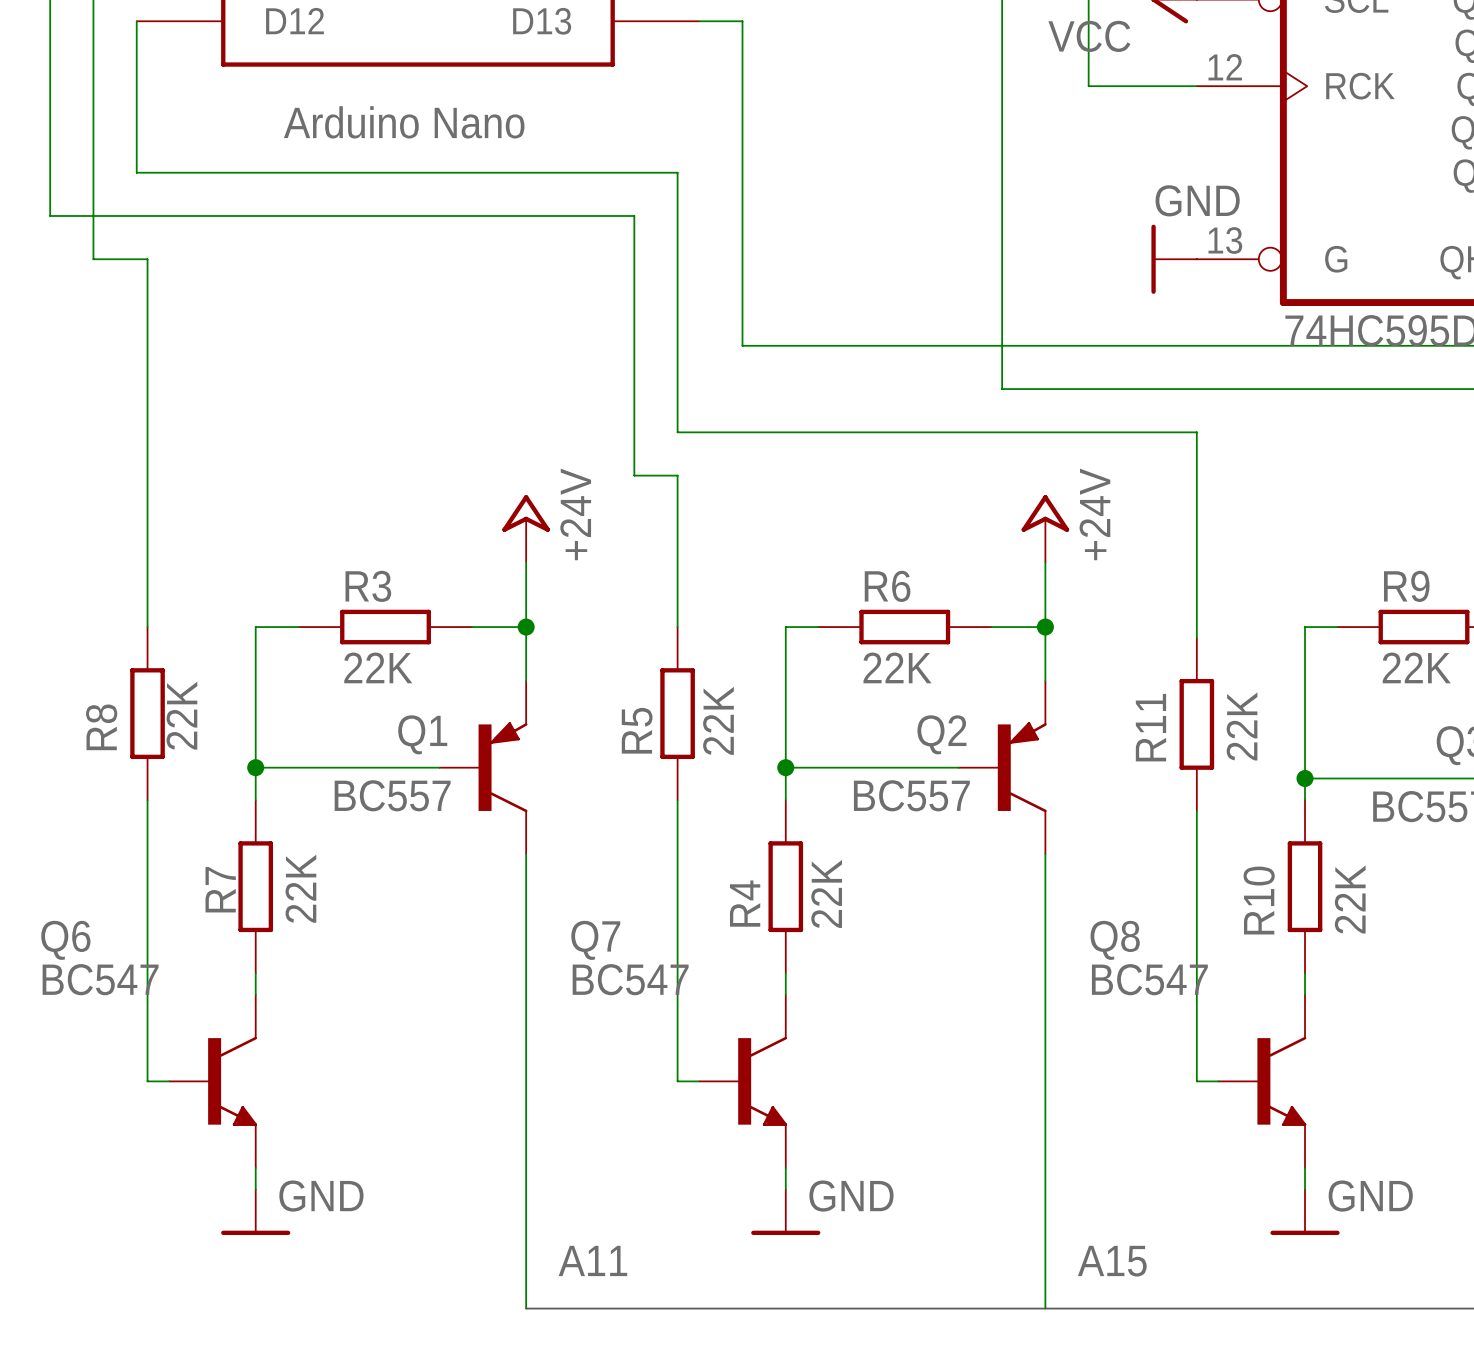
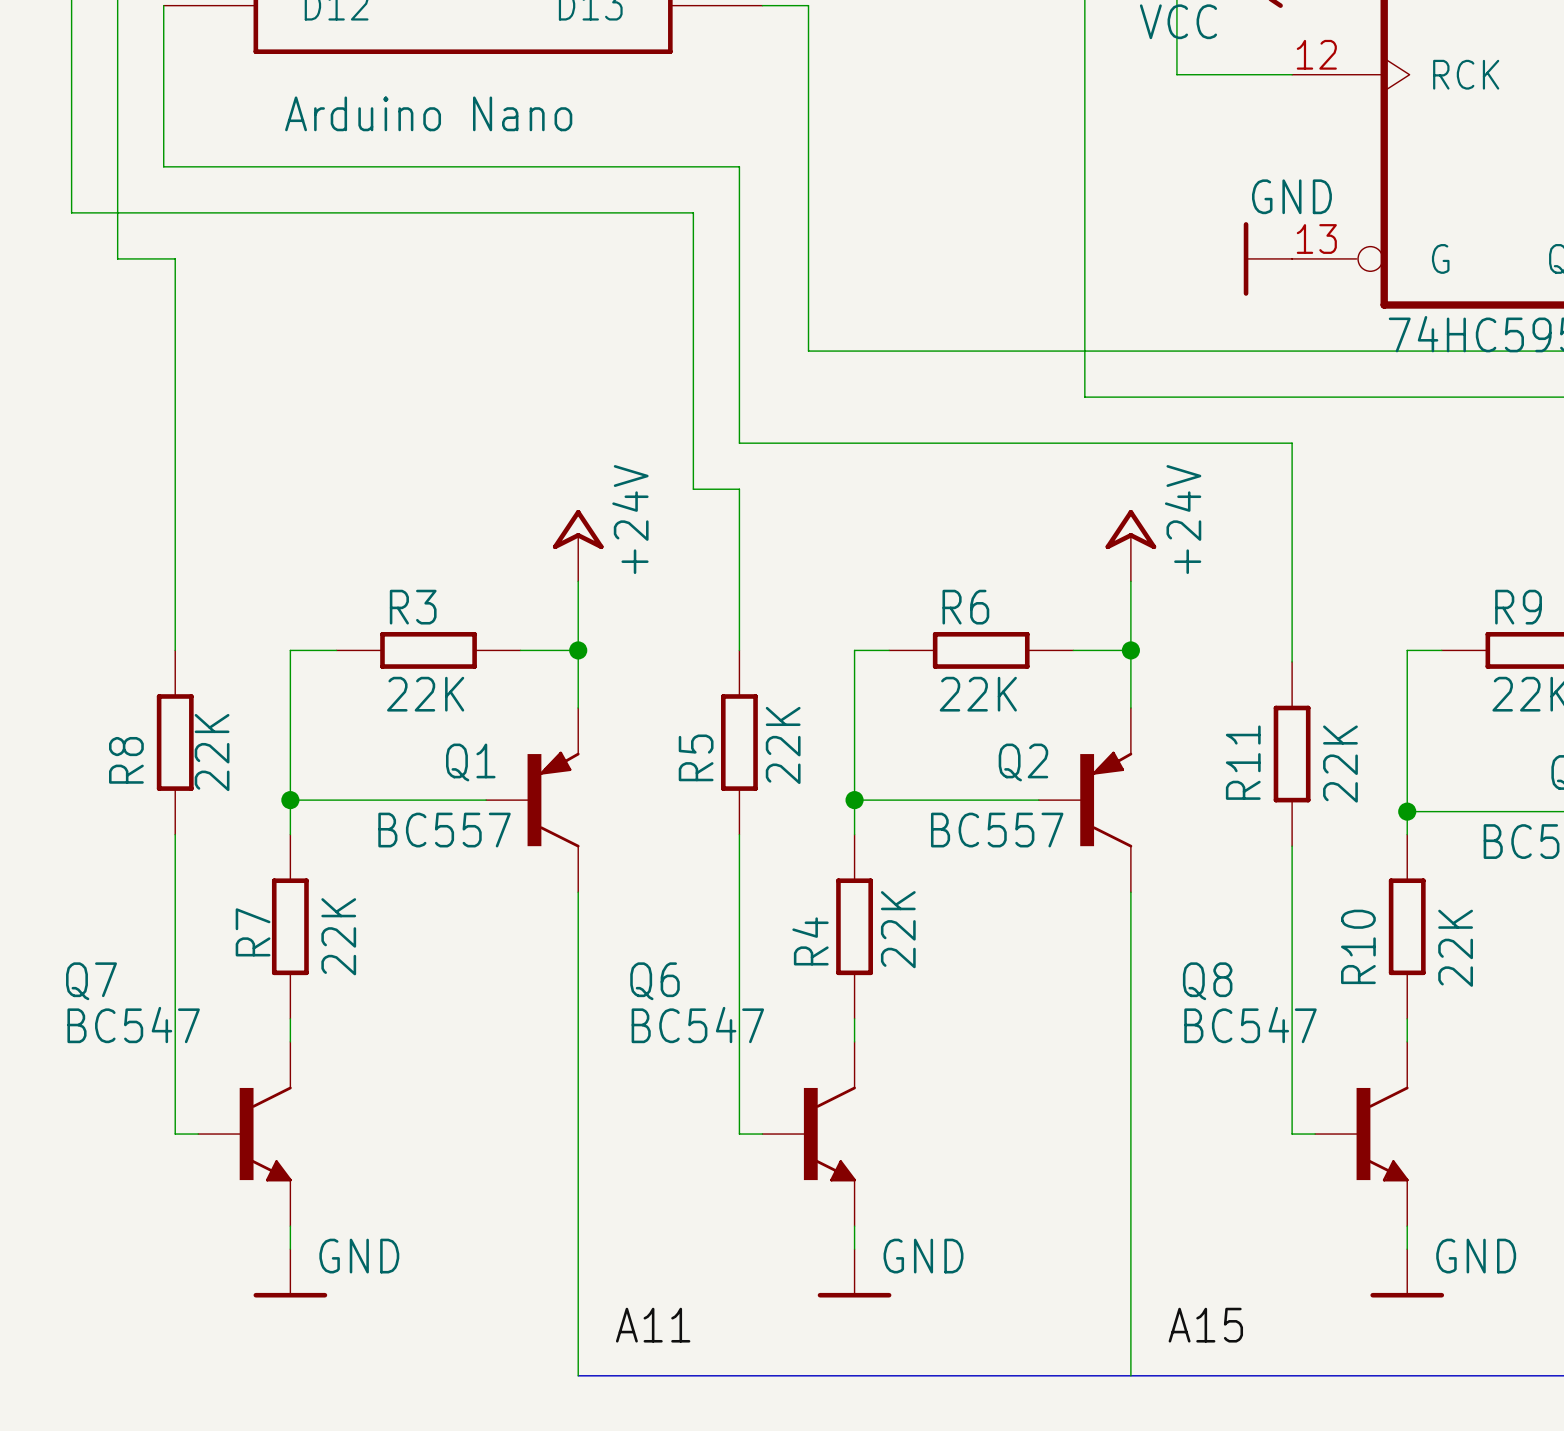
Q6 name: Q6 (65, 940) -> Q7 (91, 981)
Q7 name: Q7 (595, 940) -> Q6 (654, 981)

